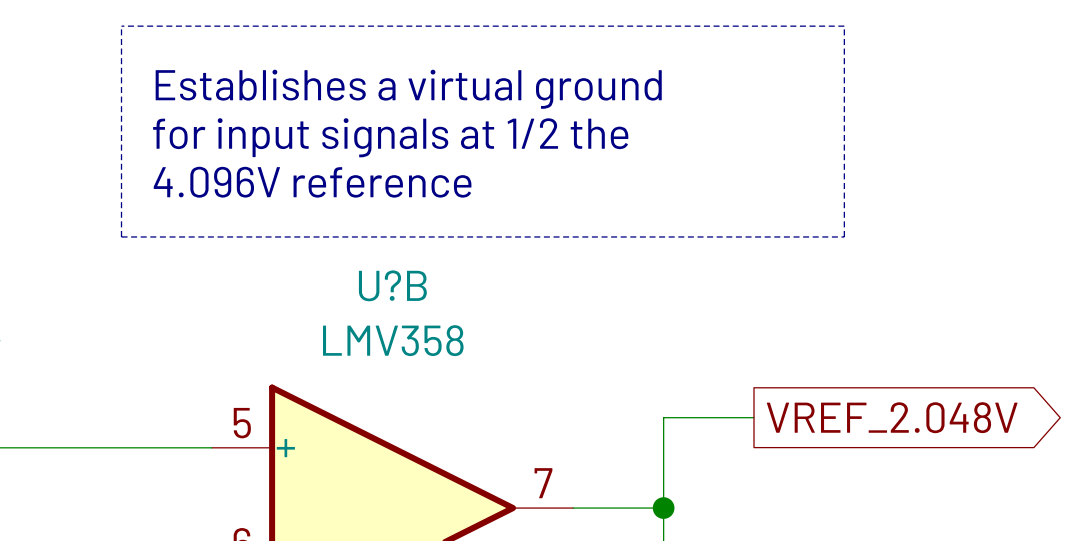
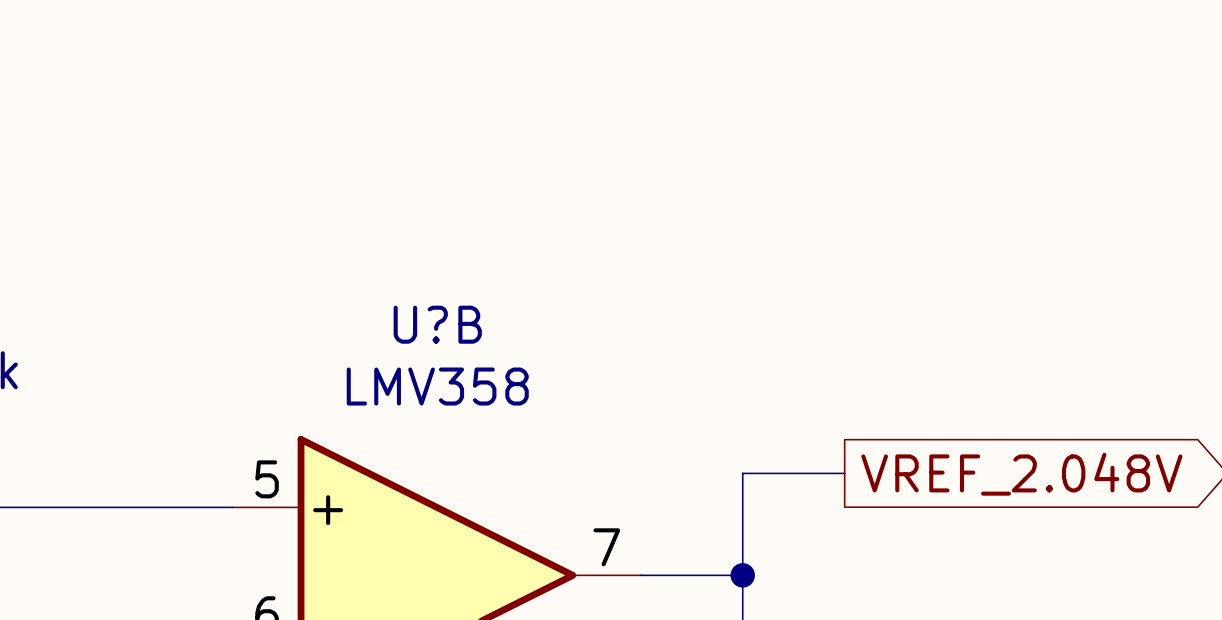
line: (121, 26) (844, 26) (844, 236) (121, 236) (121, 26) -> none
text: Establishes a virtual ground (408, 89) -> none
text: for input signals at 1/2 the (390, 137) -> none
text: 4.096V reference (312, 182) -> none

